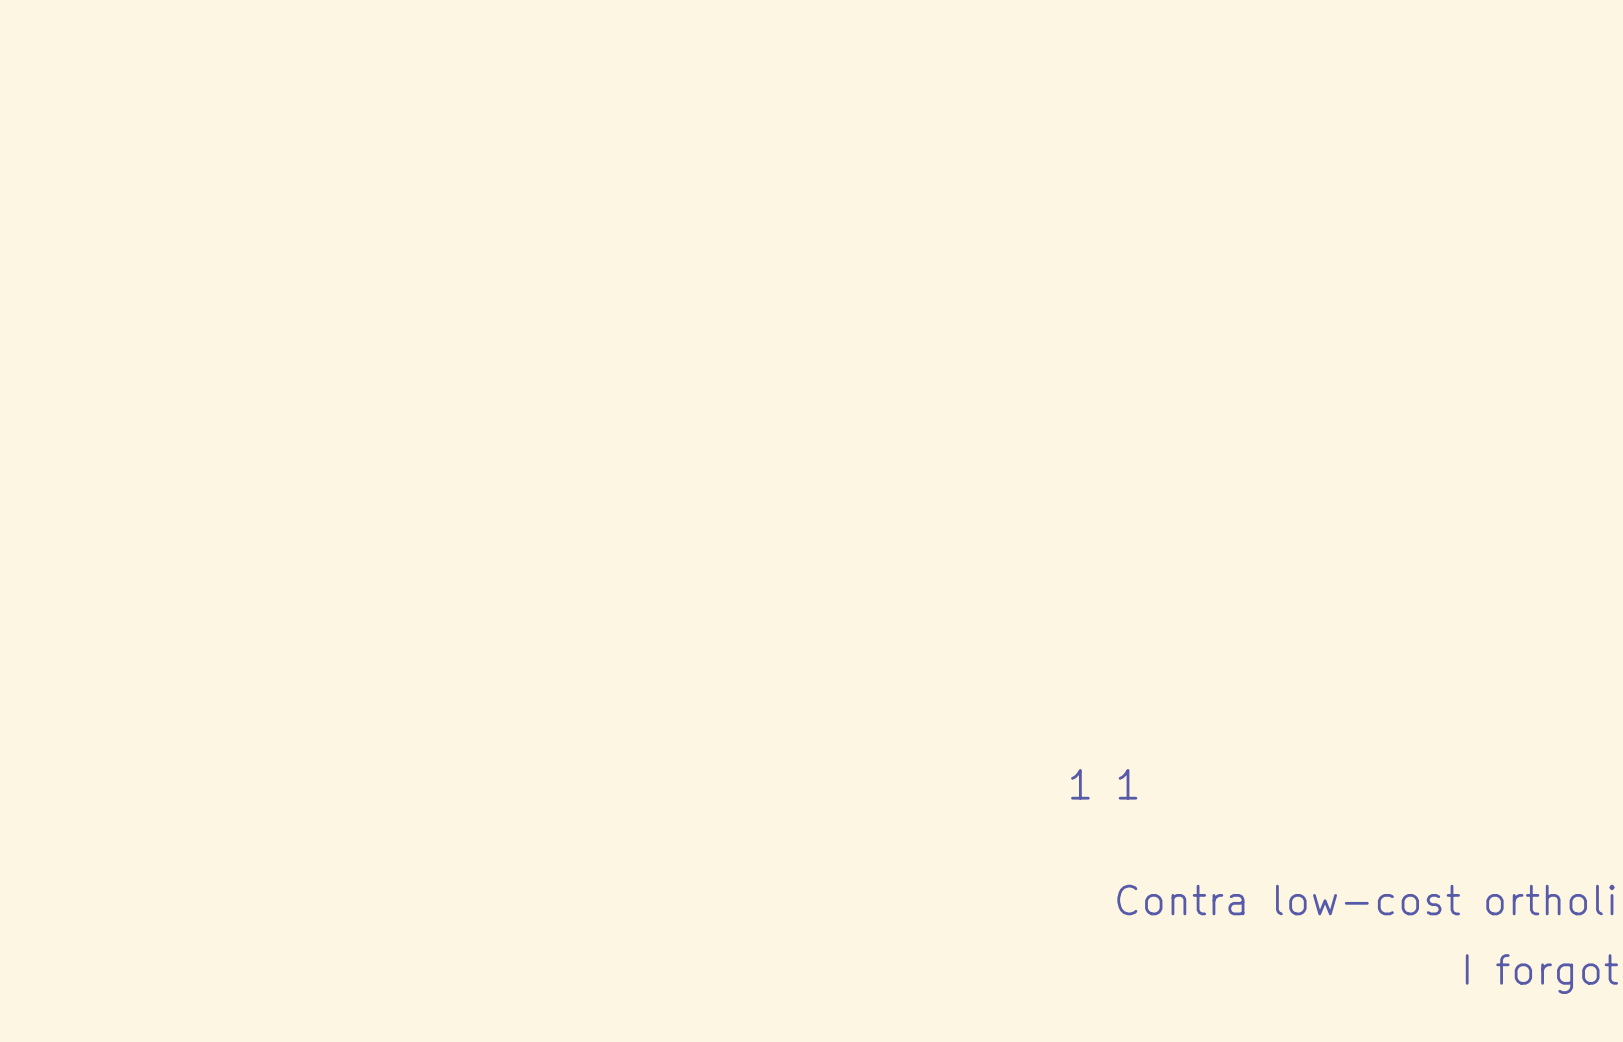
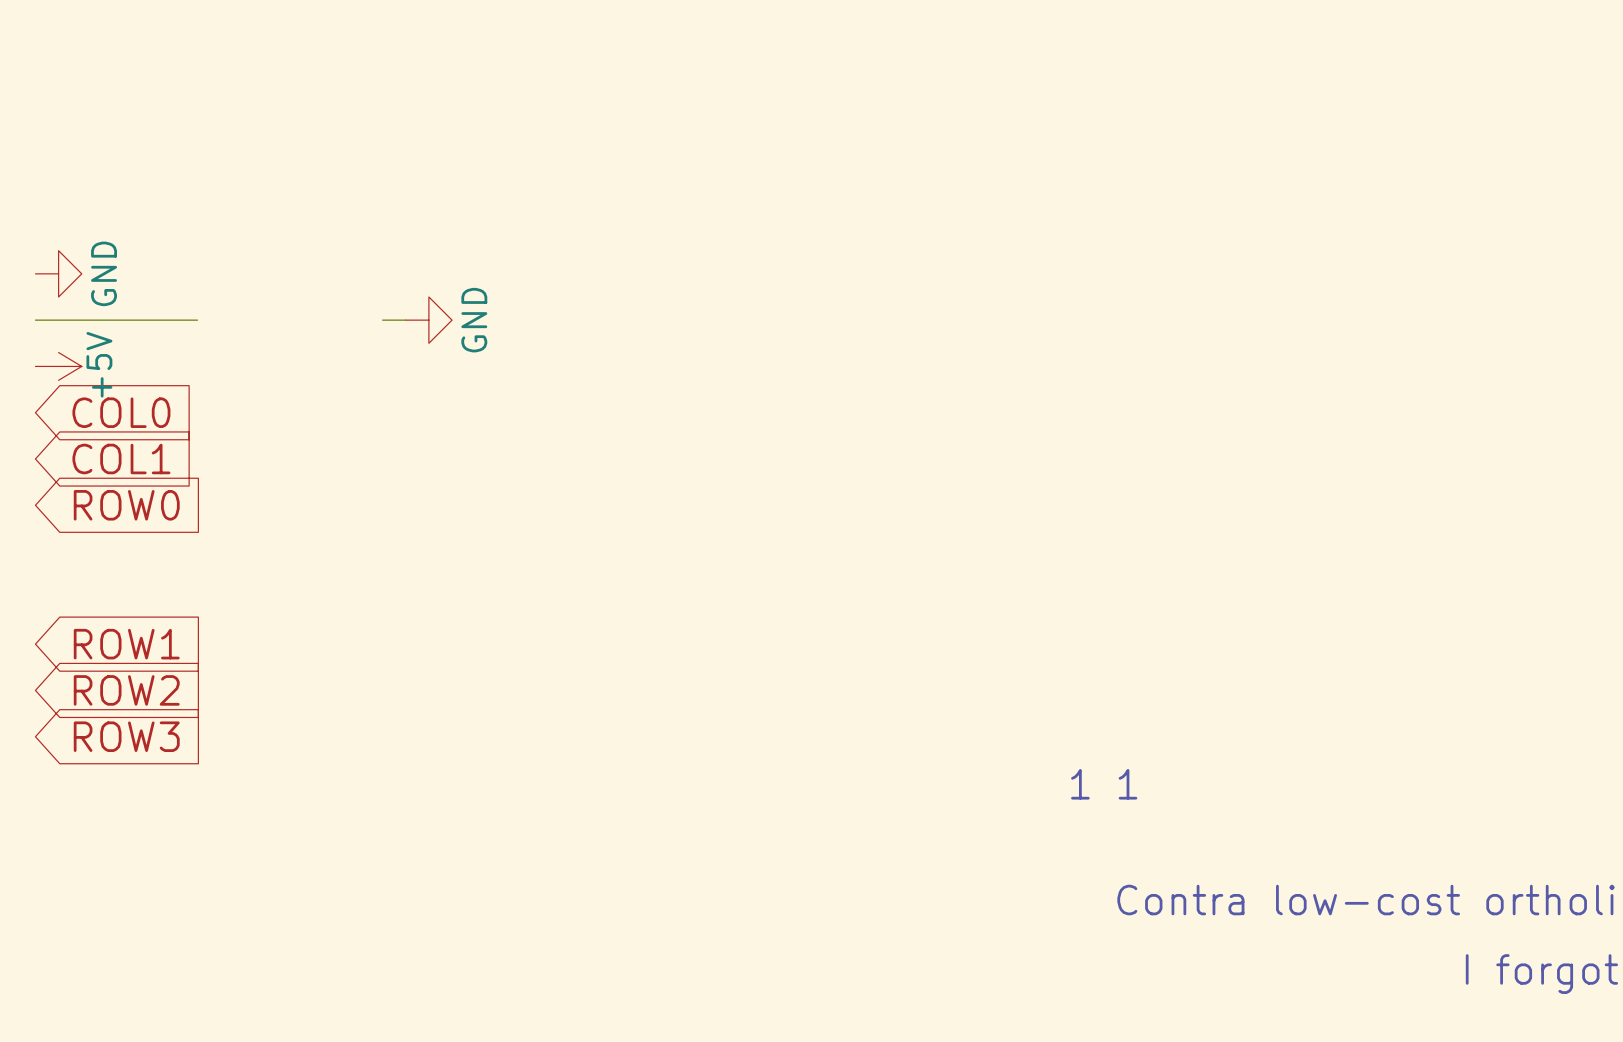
power symbol: none -> GND (58, 273)
wire: none -> (35, 320) (197, 320)
wire: none -> (382, 320) (405, 320)
power symbol: none -> GND (428, 320)
power symbol: none -> +5V (58, 366)
global label: none -> COL0 (121, 412)
global label: none -> COL1 (121, 459)
global label: none -> ROW0 (126, 505)
global label: none -> ROW1 (126, 644)
global label: none -> ROW2 (126, 690)
global label: none -> ROW3 (126, 736)

